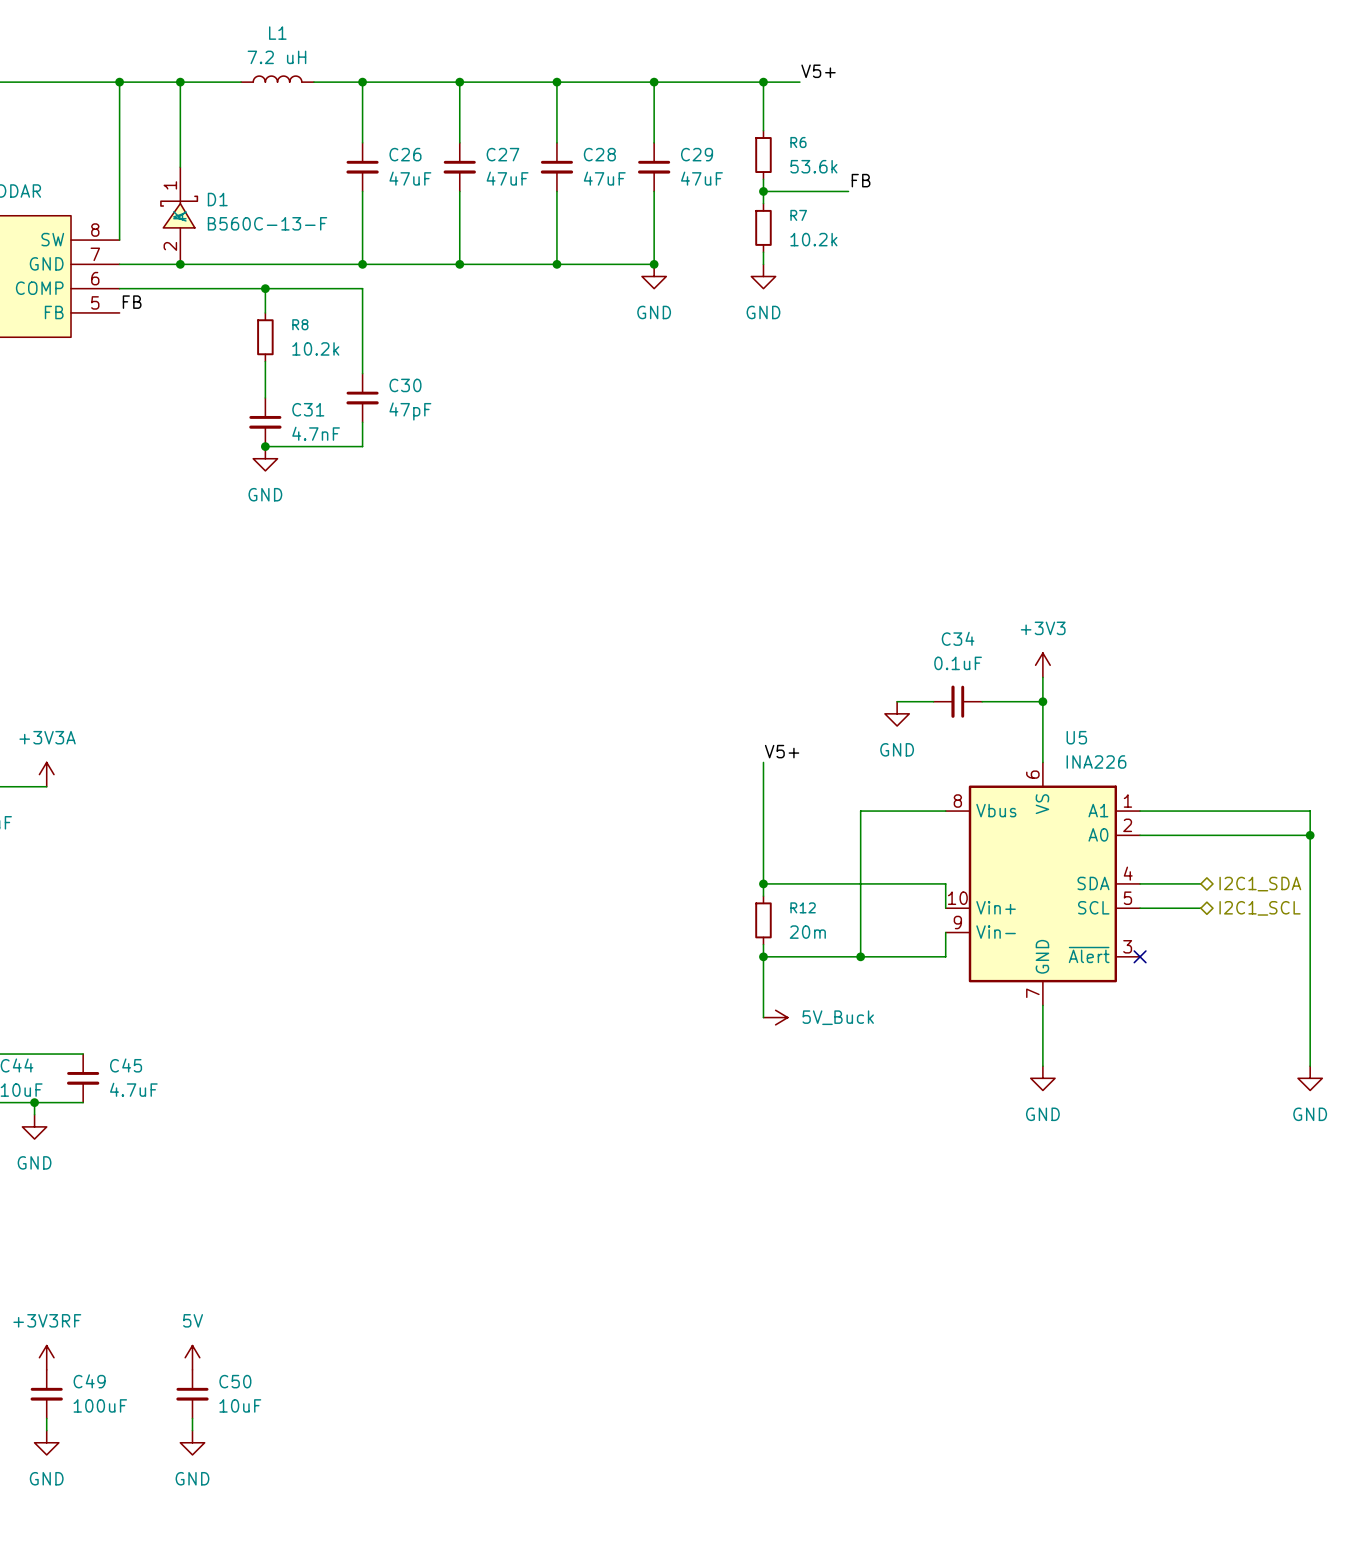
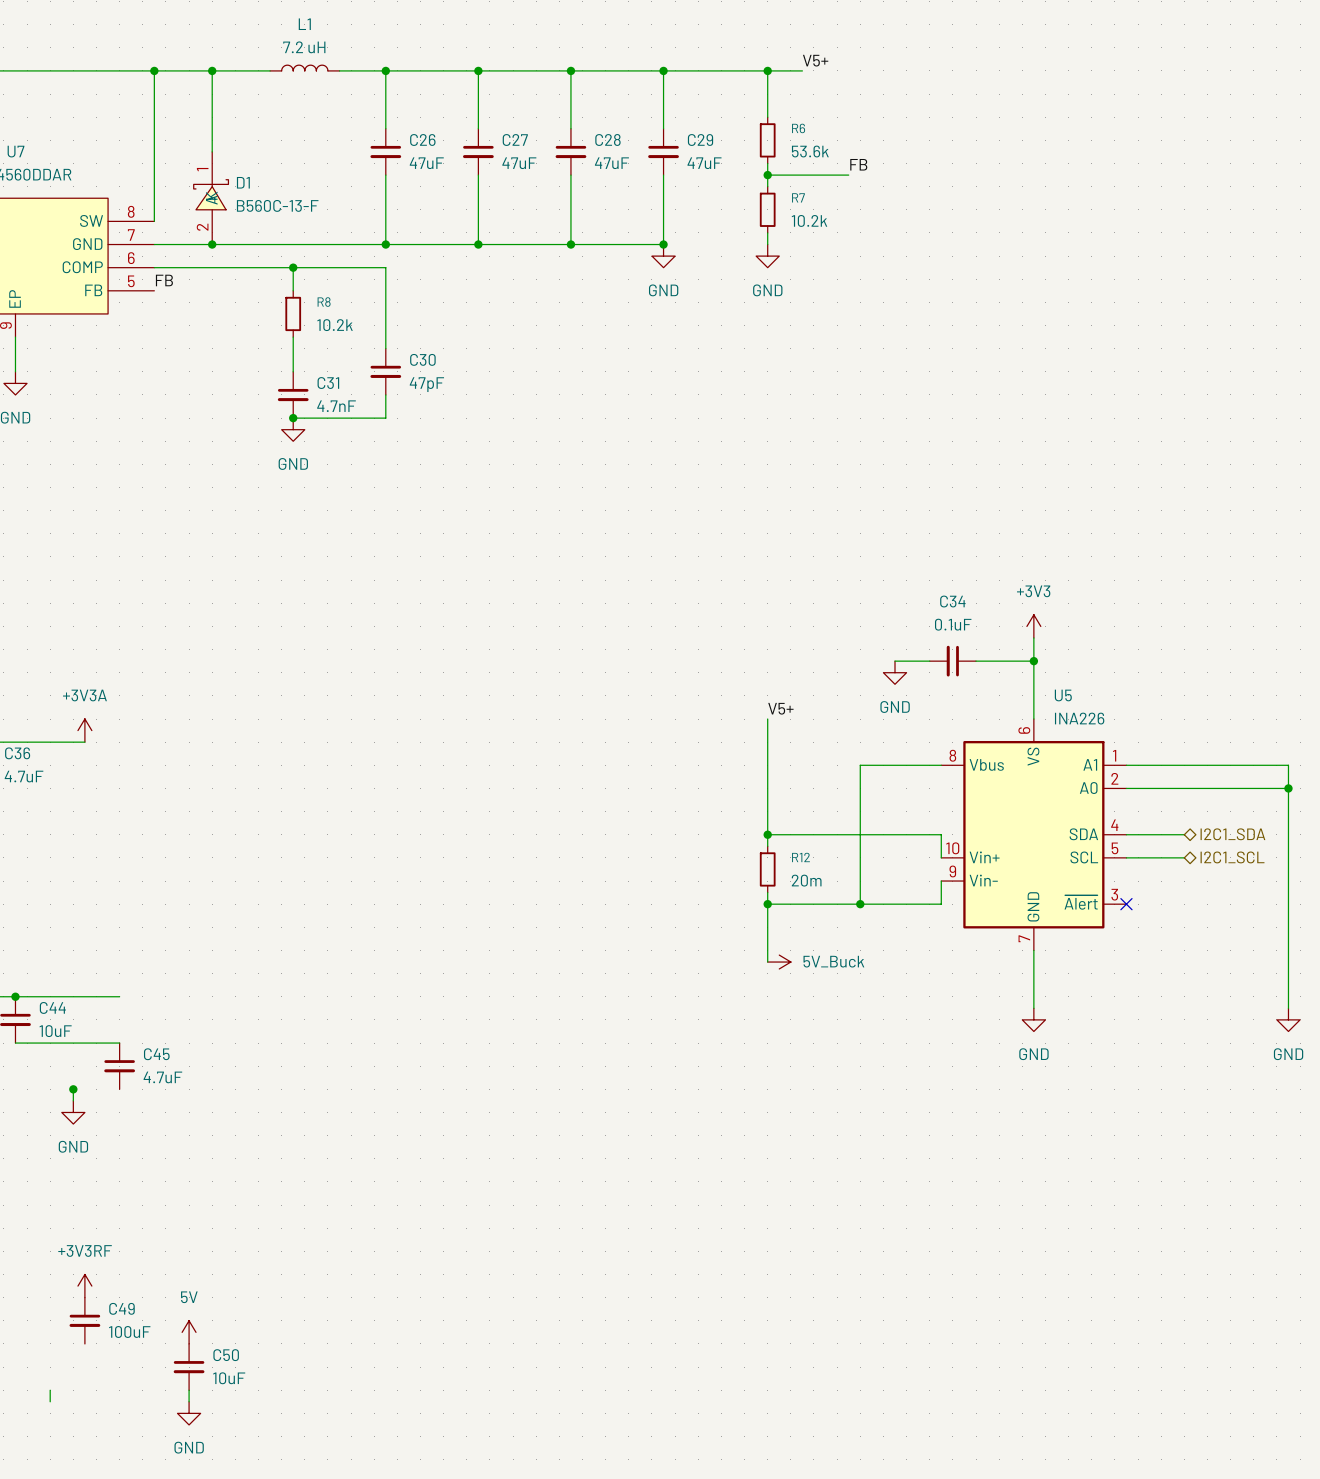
C45 position: (83, 1078) -> (119, 1066)
wire: (34, 1102) (34, 1114) -> (73, 1089) (73, 1100)
junction position: (34, 1102) -> (73, 1089)
power symbol position: GND (34, 1126) -> GND (73, 1112)
power symbol position: 5V (192, 1357) -> 5V (189, 1332)
C50 position: (192, 1394) -> (189, 1367)
wire: (46, 1418) (46, 1430) -> (50, 1390) (50, 1401)
wire: (192, 1418) (192, 1430) -> (189, 1390) (189, 1401)
power symbol: GND (46, 1442) -> none
power symbol: GND (192, 1442) -> none
power symbol: none -> GND (189, 1413)

